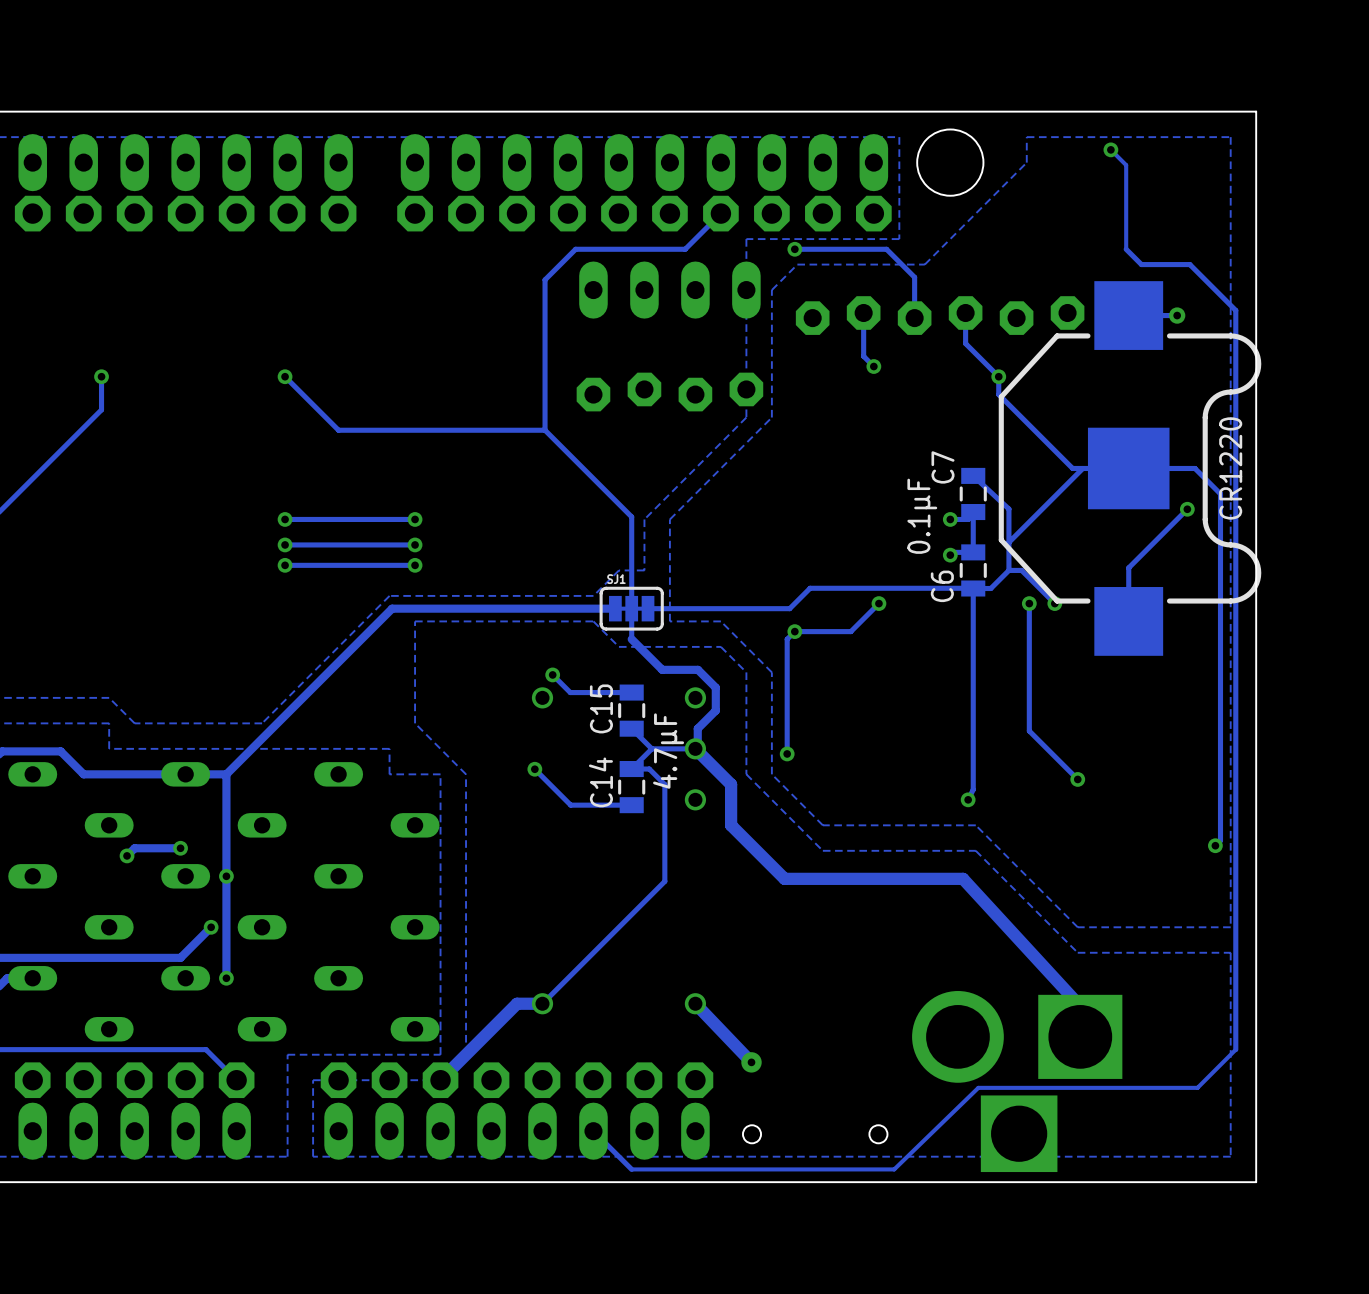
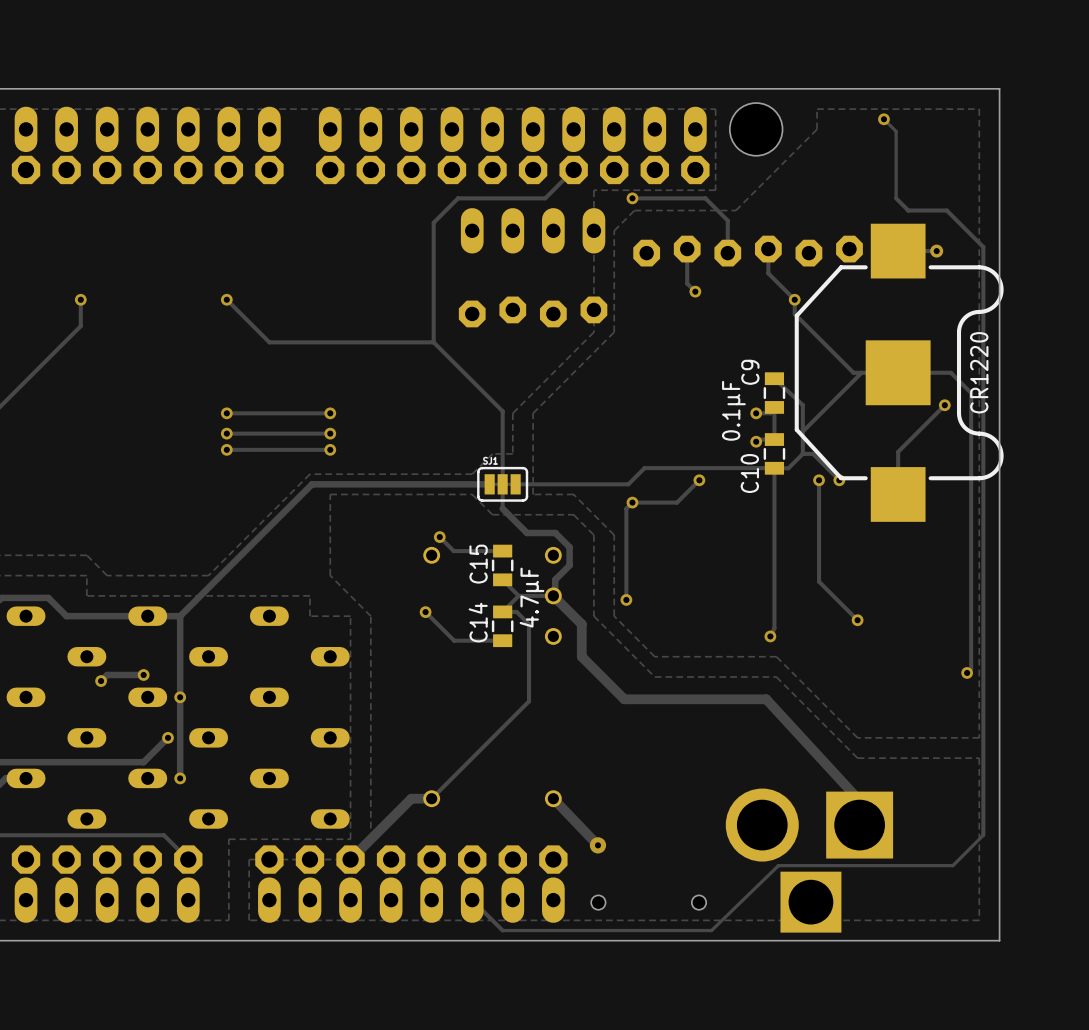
C7 name: C7 (942, 467) -> C9 (750, 372)
C6 name: C6 (942, 586) -> C10 (749, 473)

